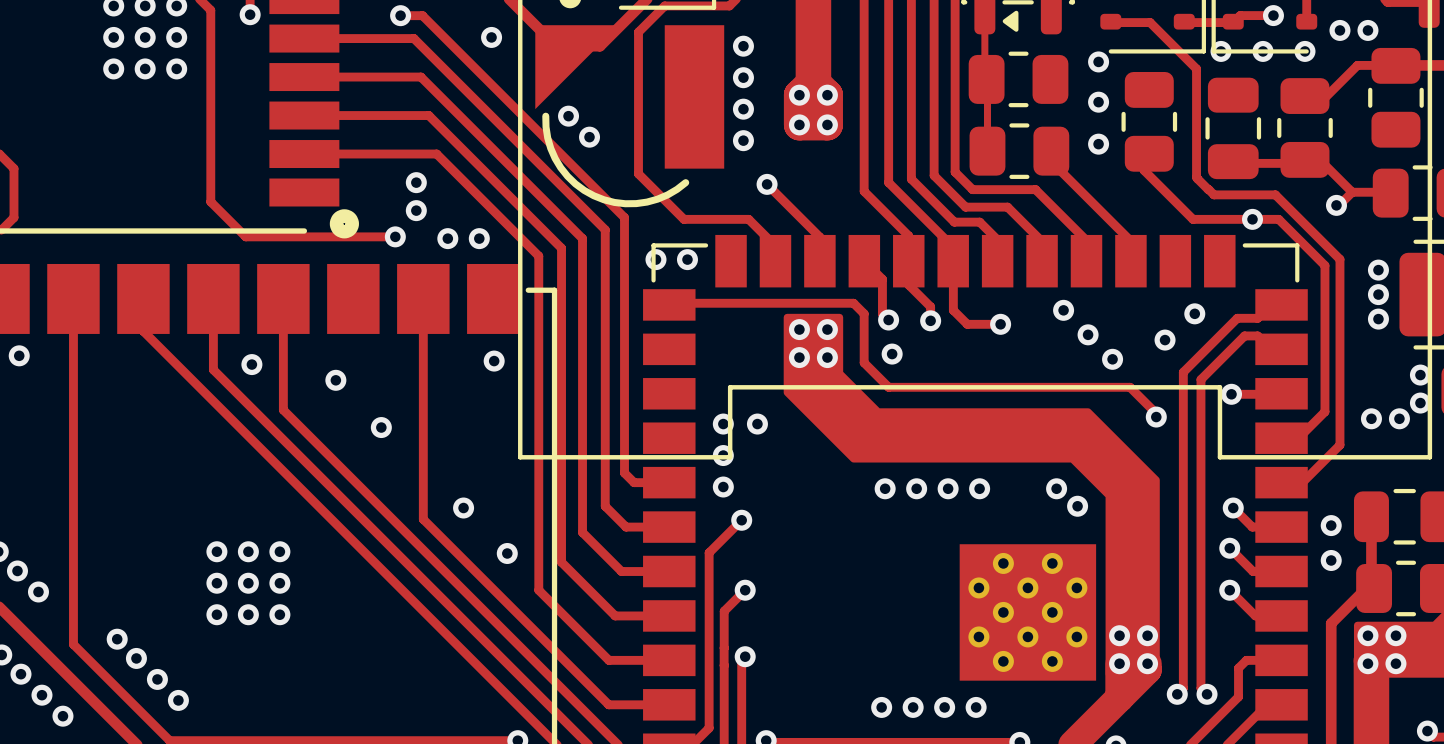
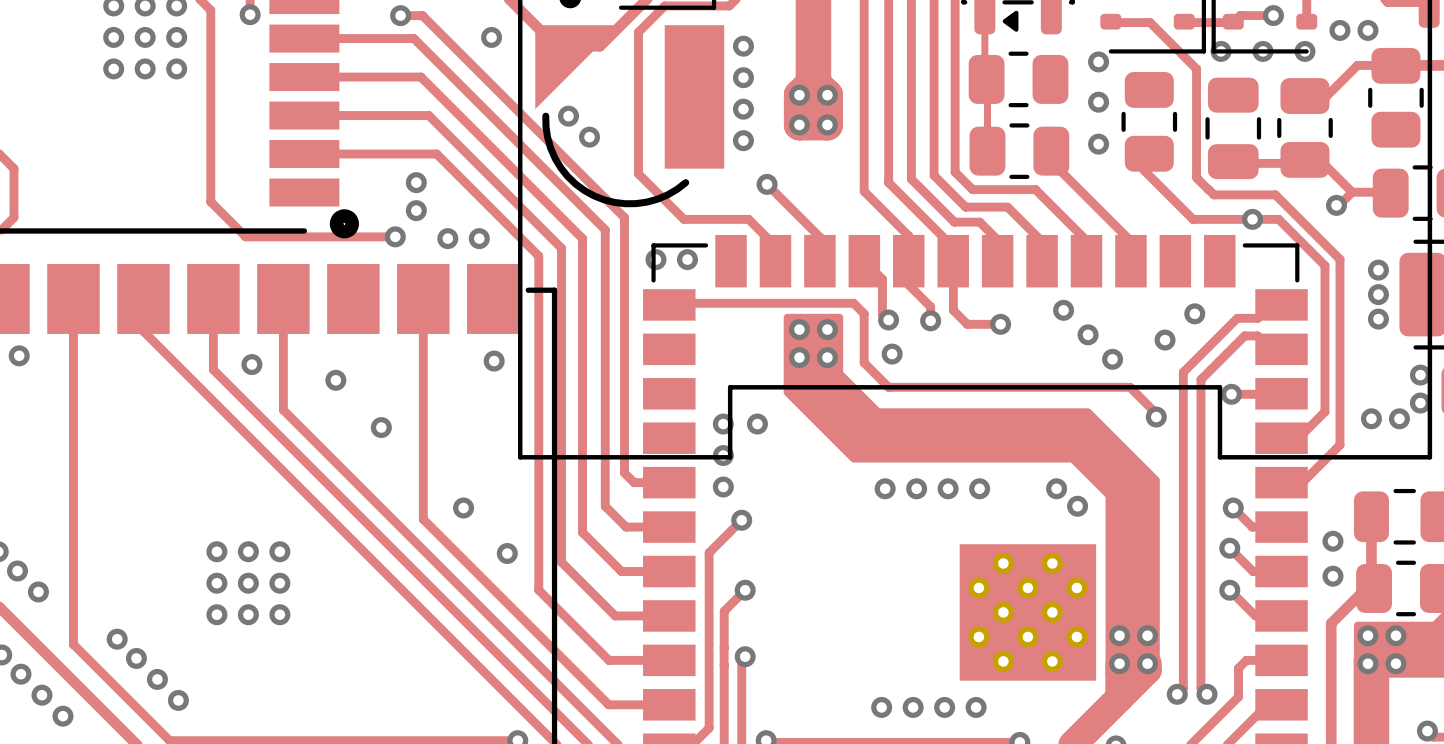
via: (1331, 525) -> none
via: none -> (1332, 541)
via: (1331, 560) -> none
via: none -> (1332, 576)

